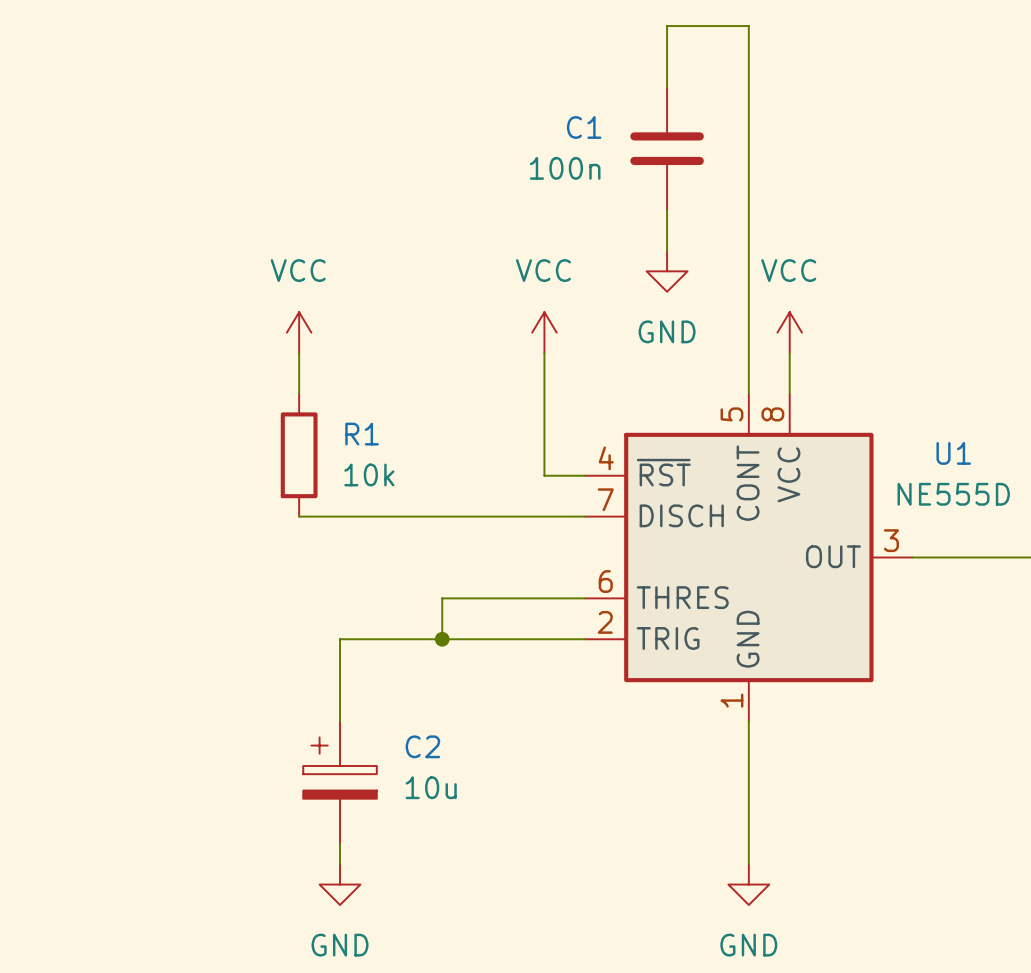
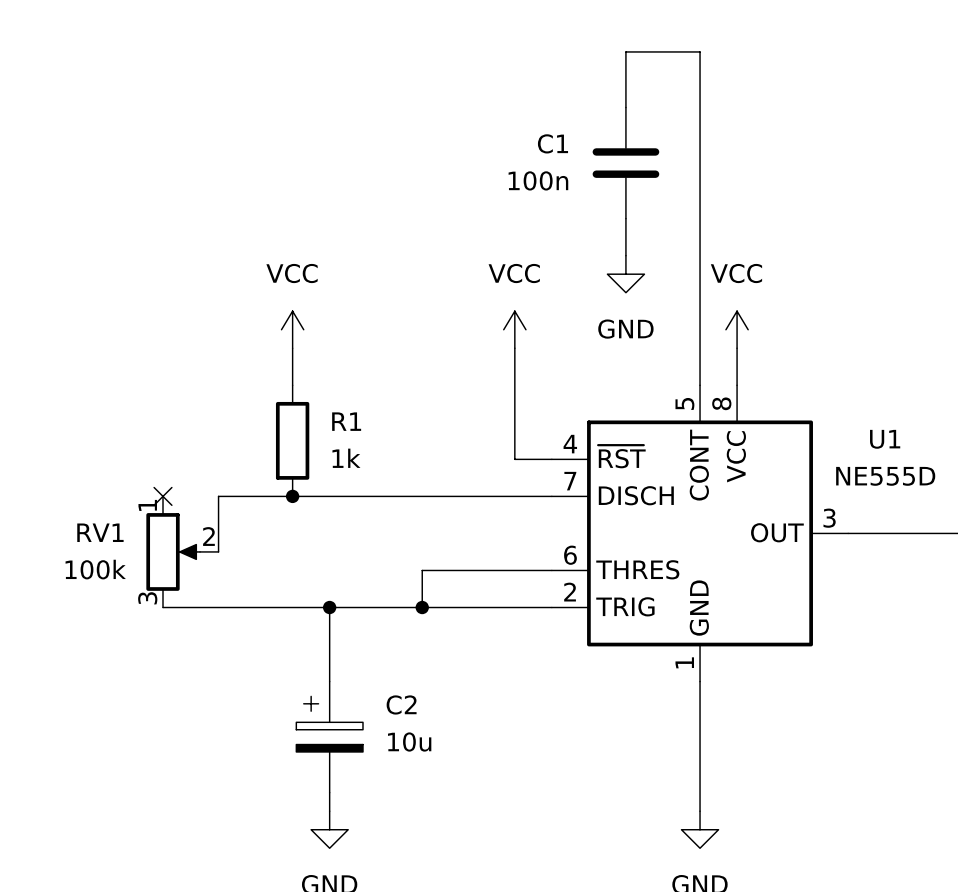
R1 value: 10k (369, 474) -> 1k (346, 458)
no-connect mark: none -> (163, 496)
wire: none -> (292, 496) (218, 496) (218, 551)
junction: none -> (292, 496)
RV1: none -> 100k (182, 551)
wire: none -> (163, 607) (329, 607)
junction: none -> (329, 607)

